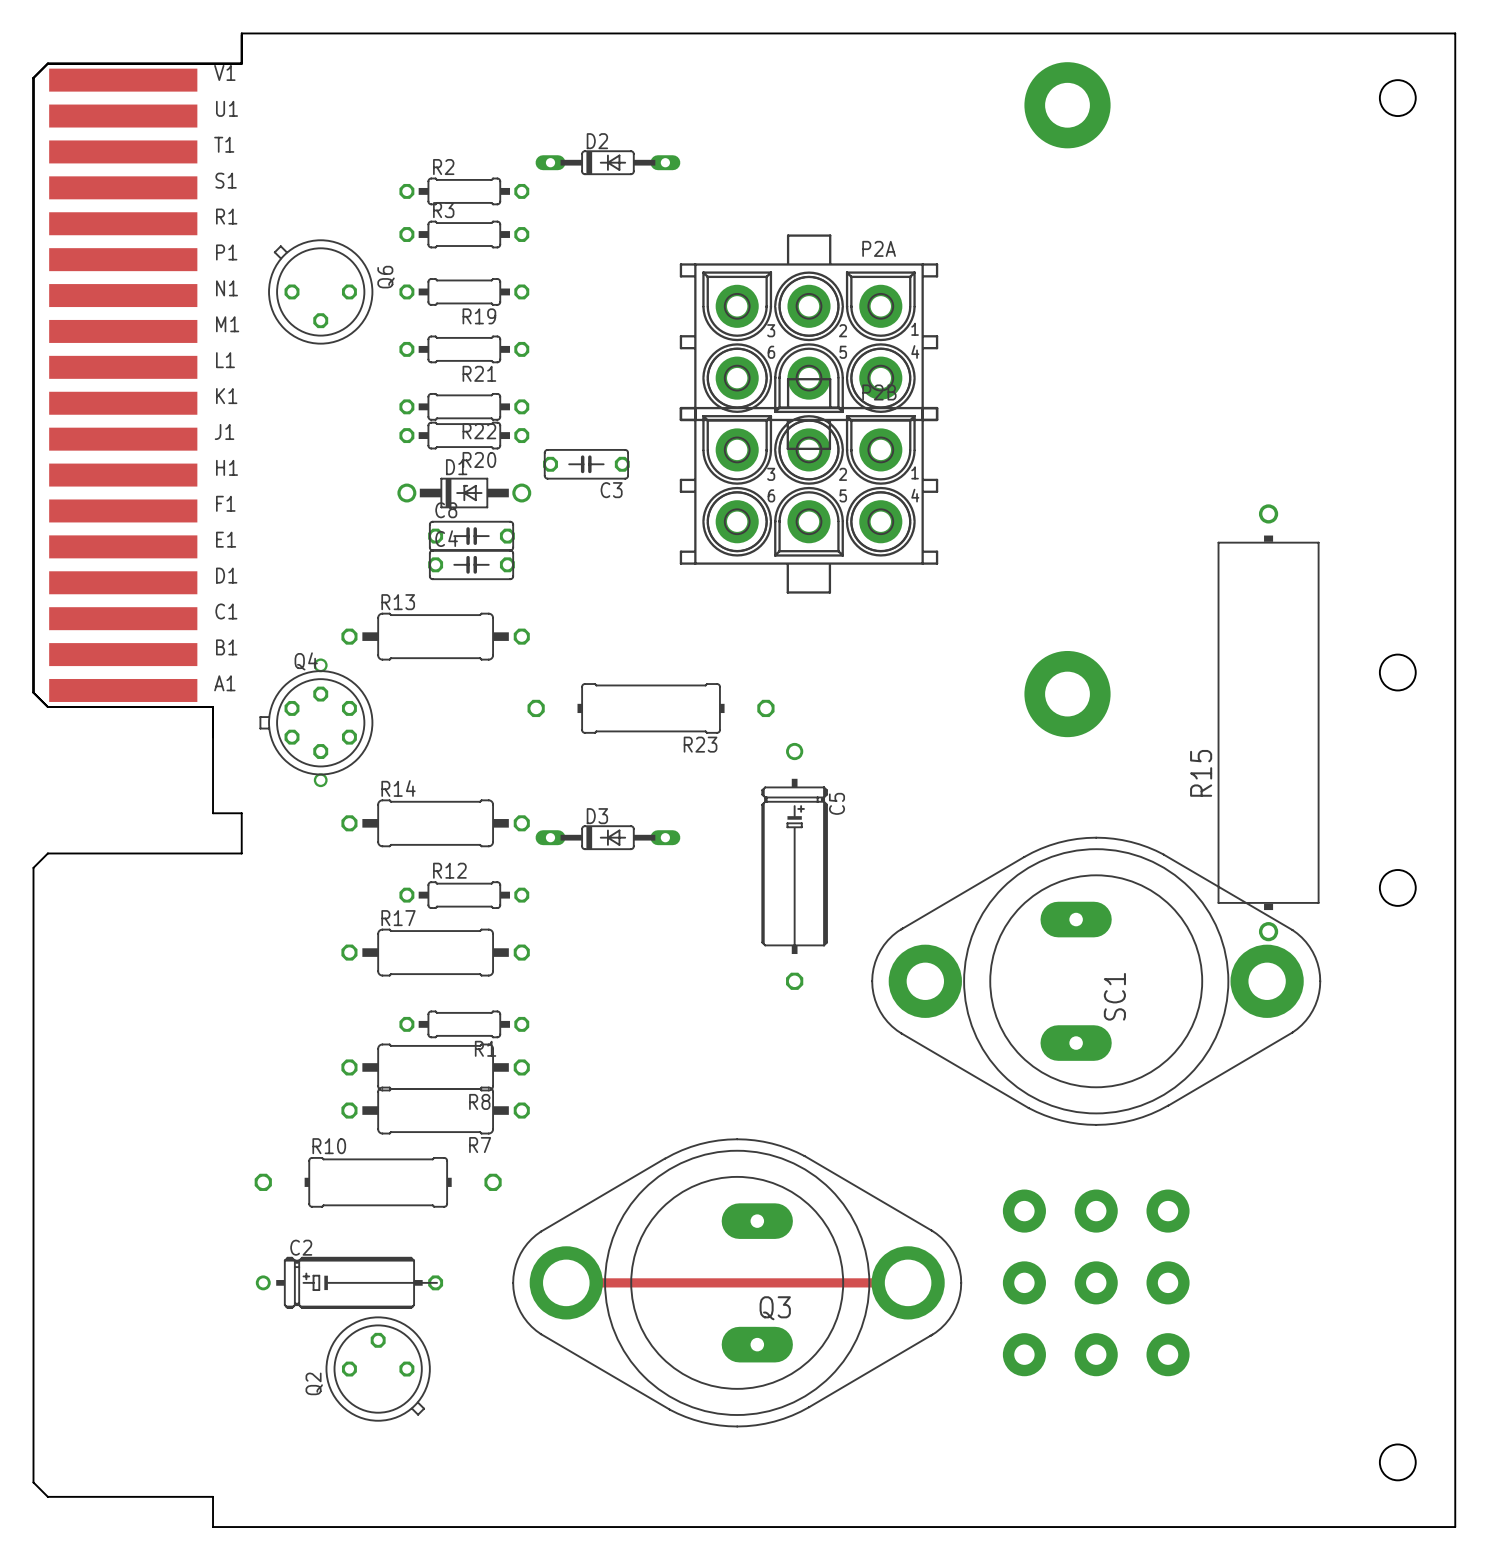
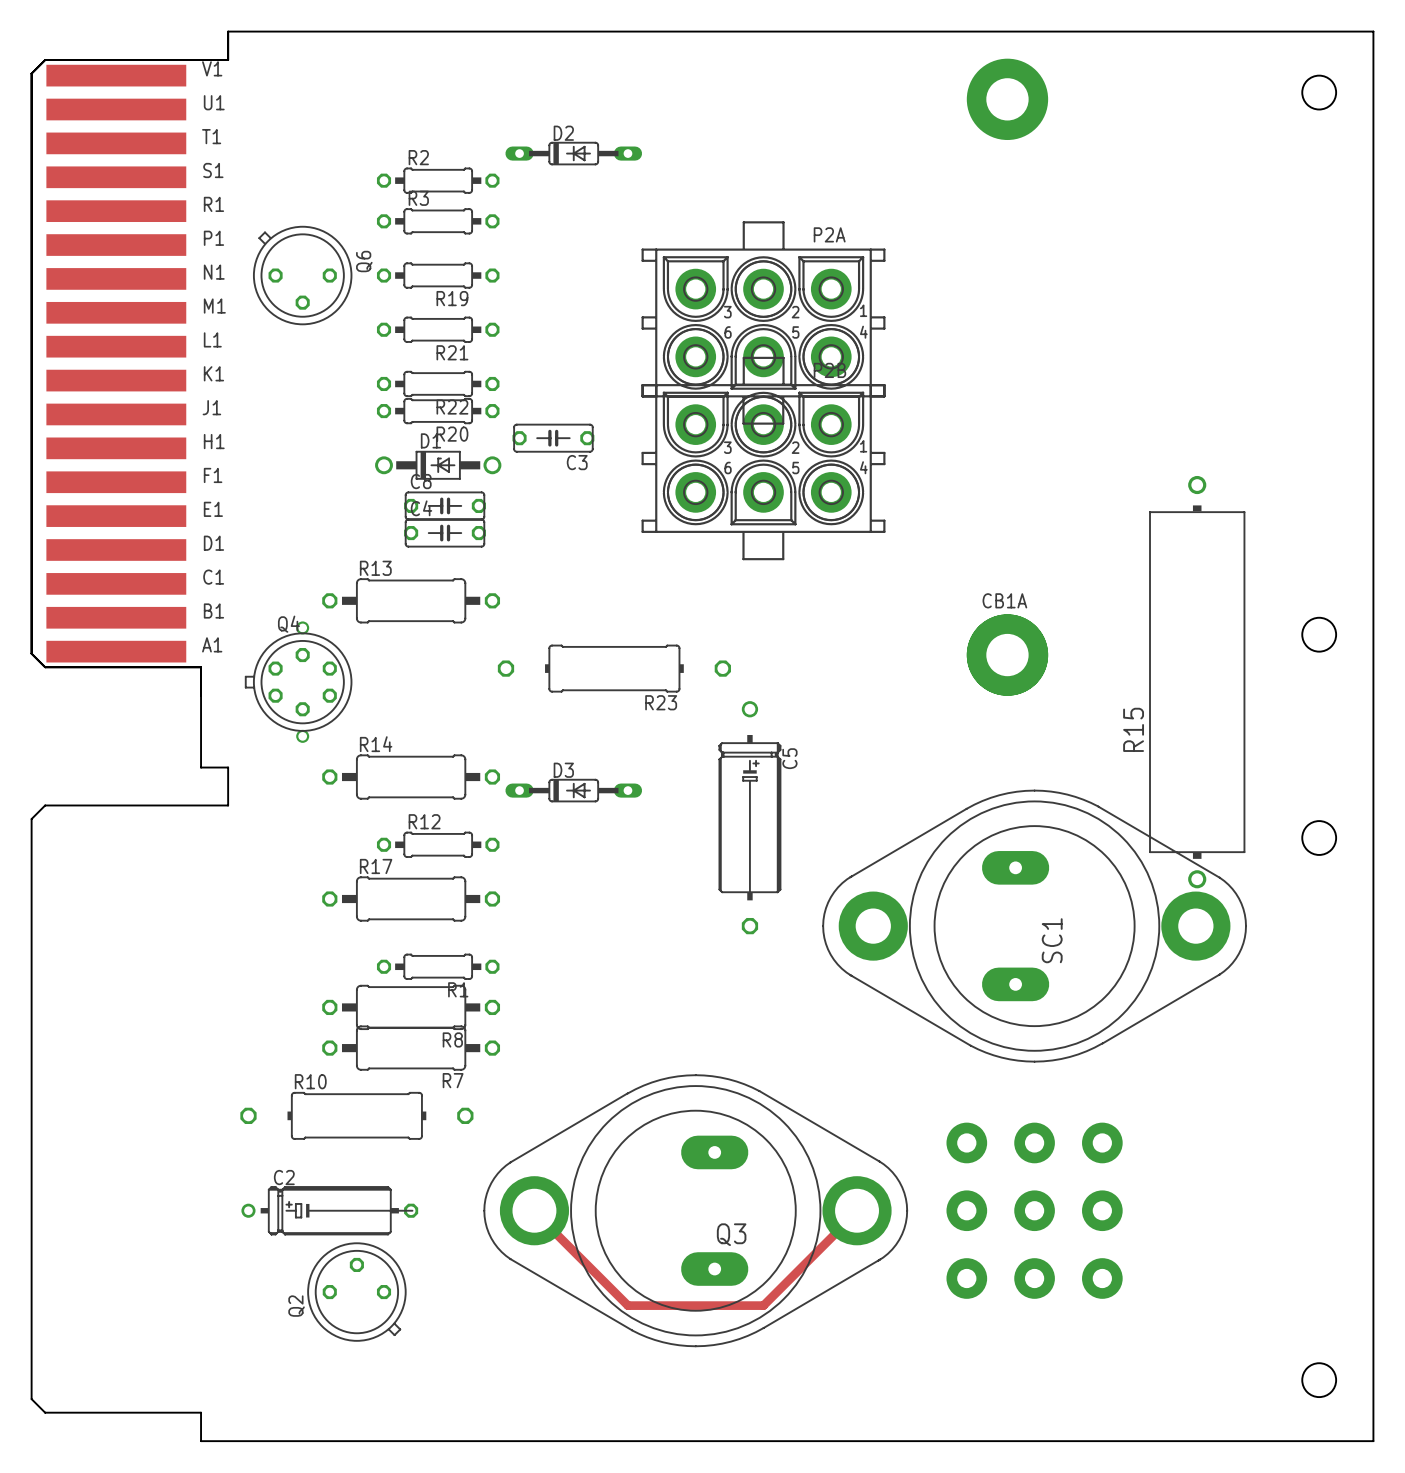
CB1A: none -> (1007, 655)
track: (564, 1282) (908, 1282) -> (534, 1210) (627, 1305) (763, 1305) (857, 1210)

